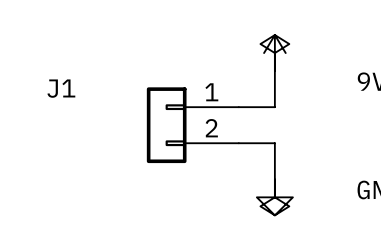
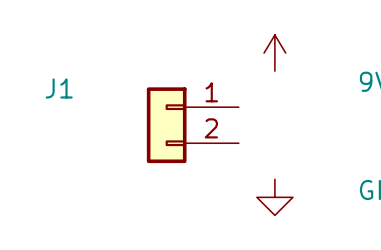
power symbol: (274, 53) -> none
wire: (274, 71) (274, 107) (238, 107) -> none
wire: (238, 143) (274, 143) (274, 179) -> none
power symbol: (274, 197) -> none

